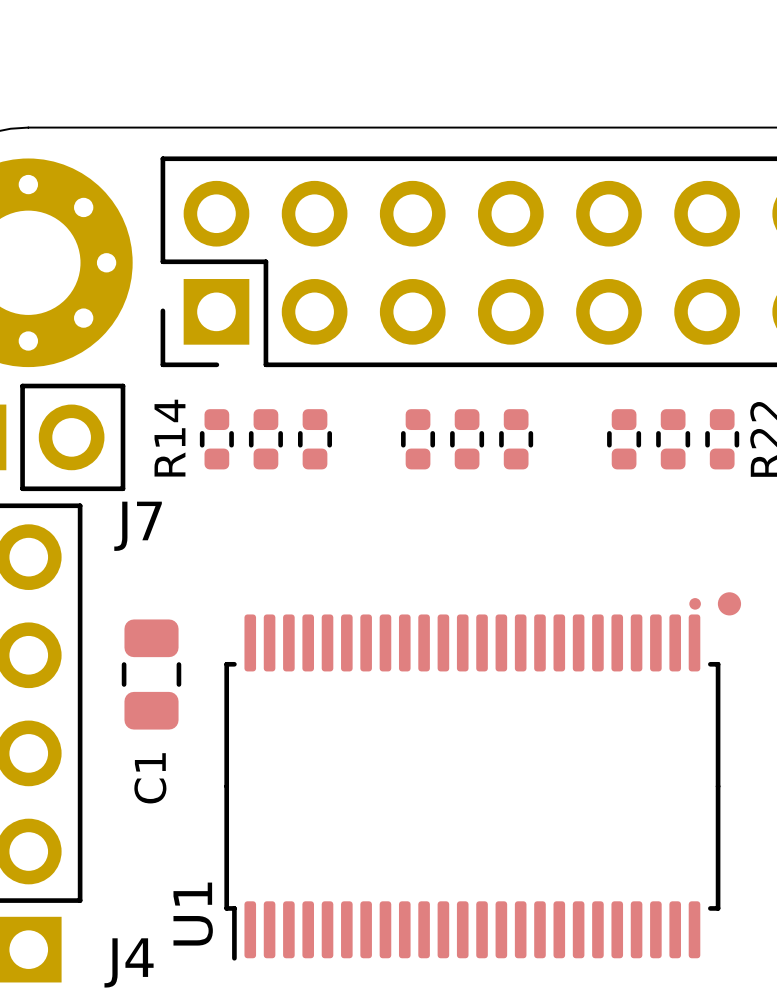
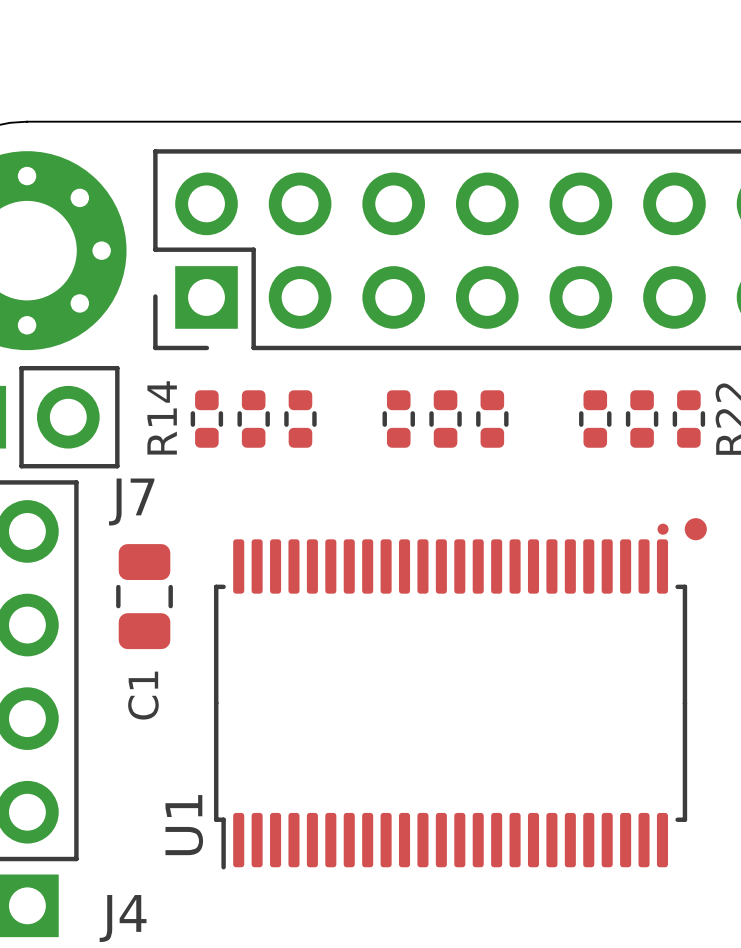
part position: (715, 603) -> (682, 529)
C1 position: (151, 674) -> (144, 596)
U1 position: (472, 787) -> (450, 704)

